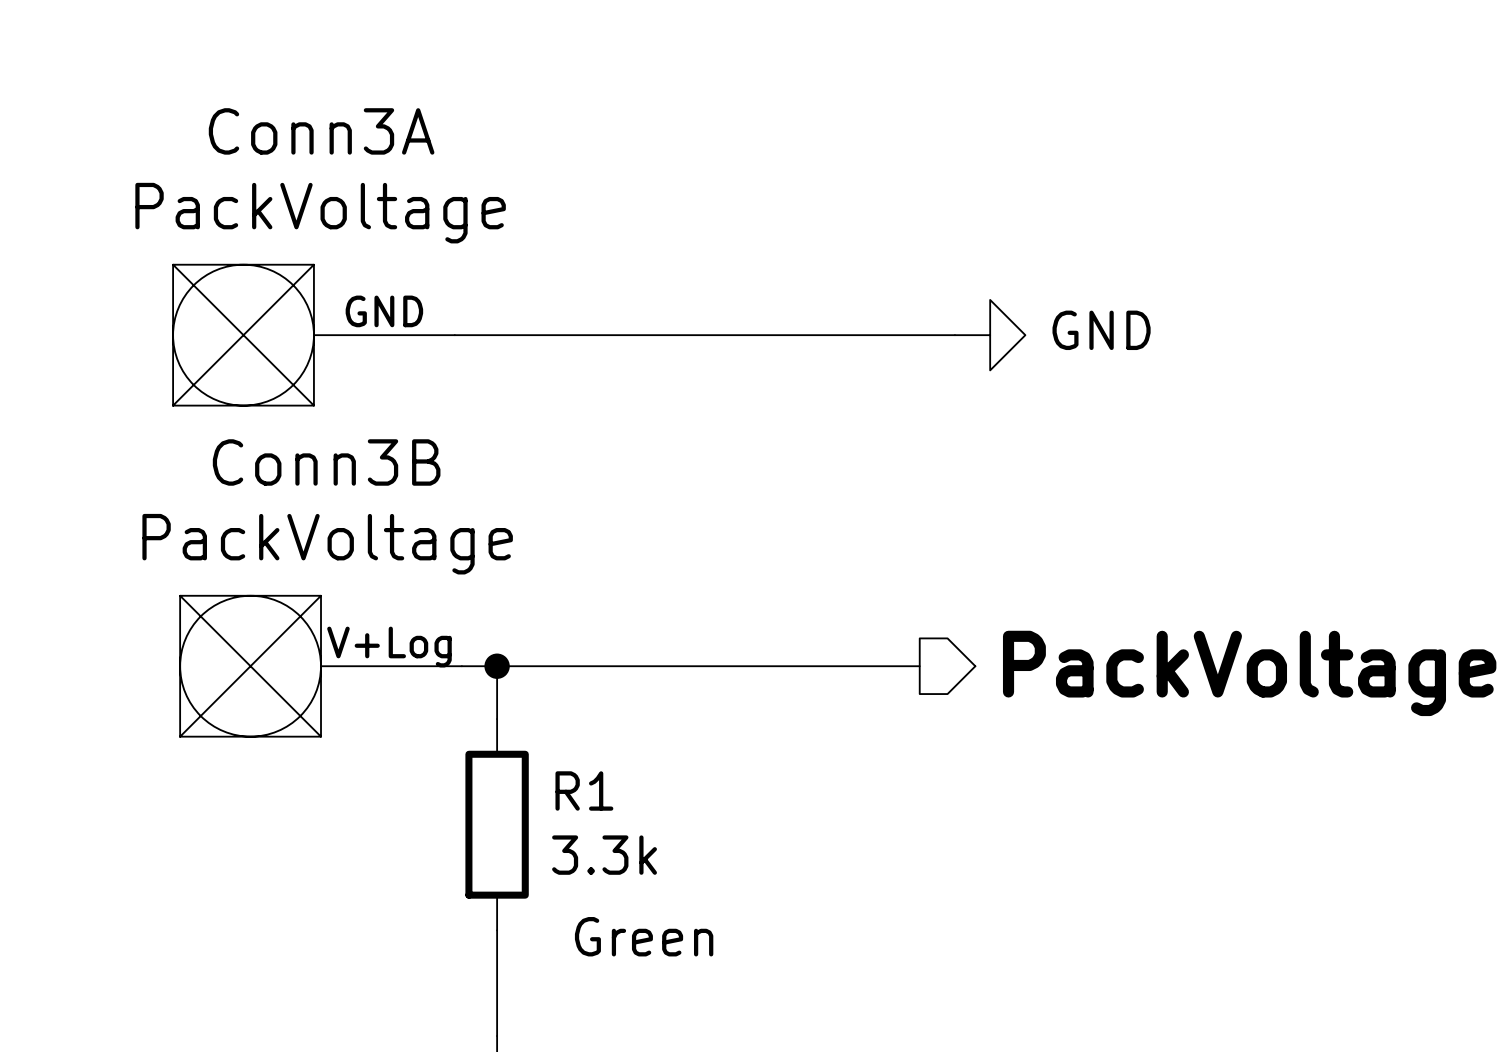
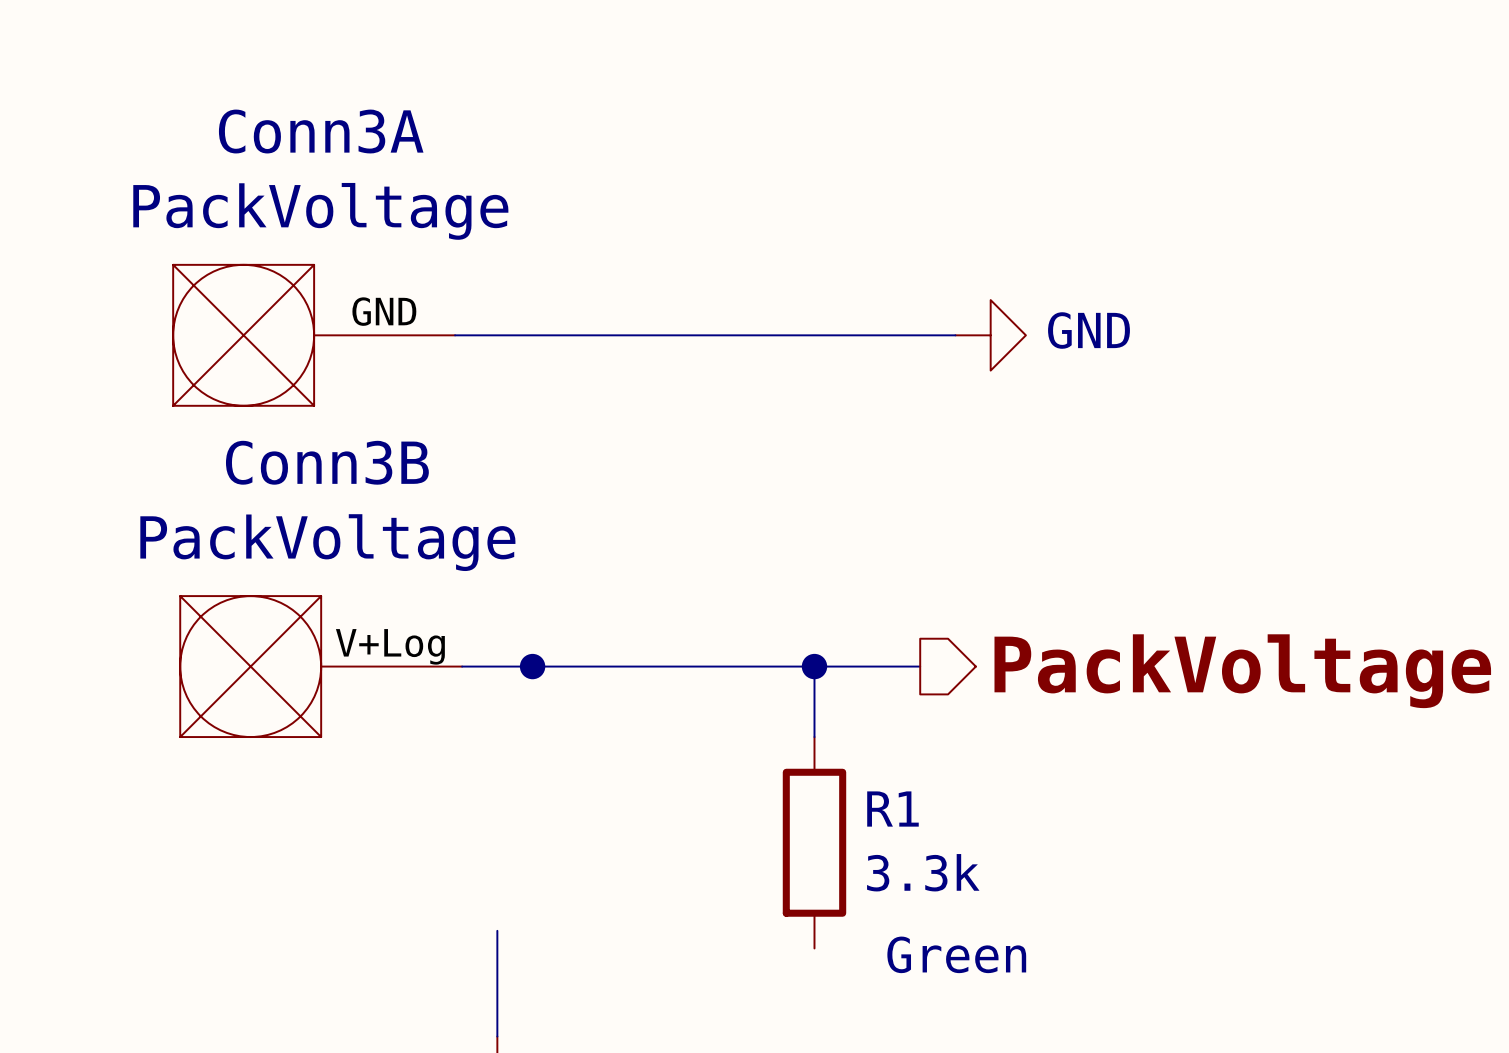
wire: (497, 666) (497, 719) -> none
junction position: (497, 666) -> (532, 666)
wire: none -> (814, 666) (814, 737)
junction: none -> (814, 666)
R1 position: (497, 824) -> (814, 842)
text position: Green (644, 936) -> Green (956, 954)

